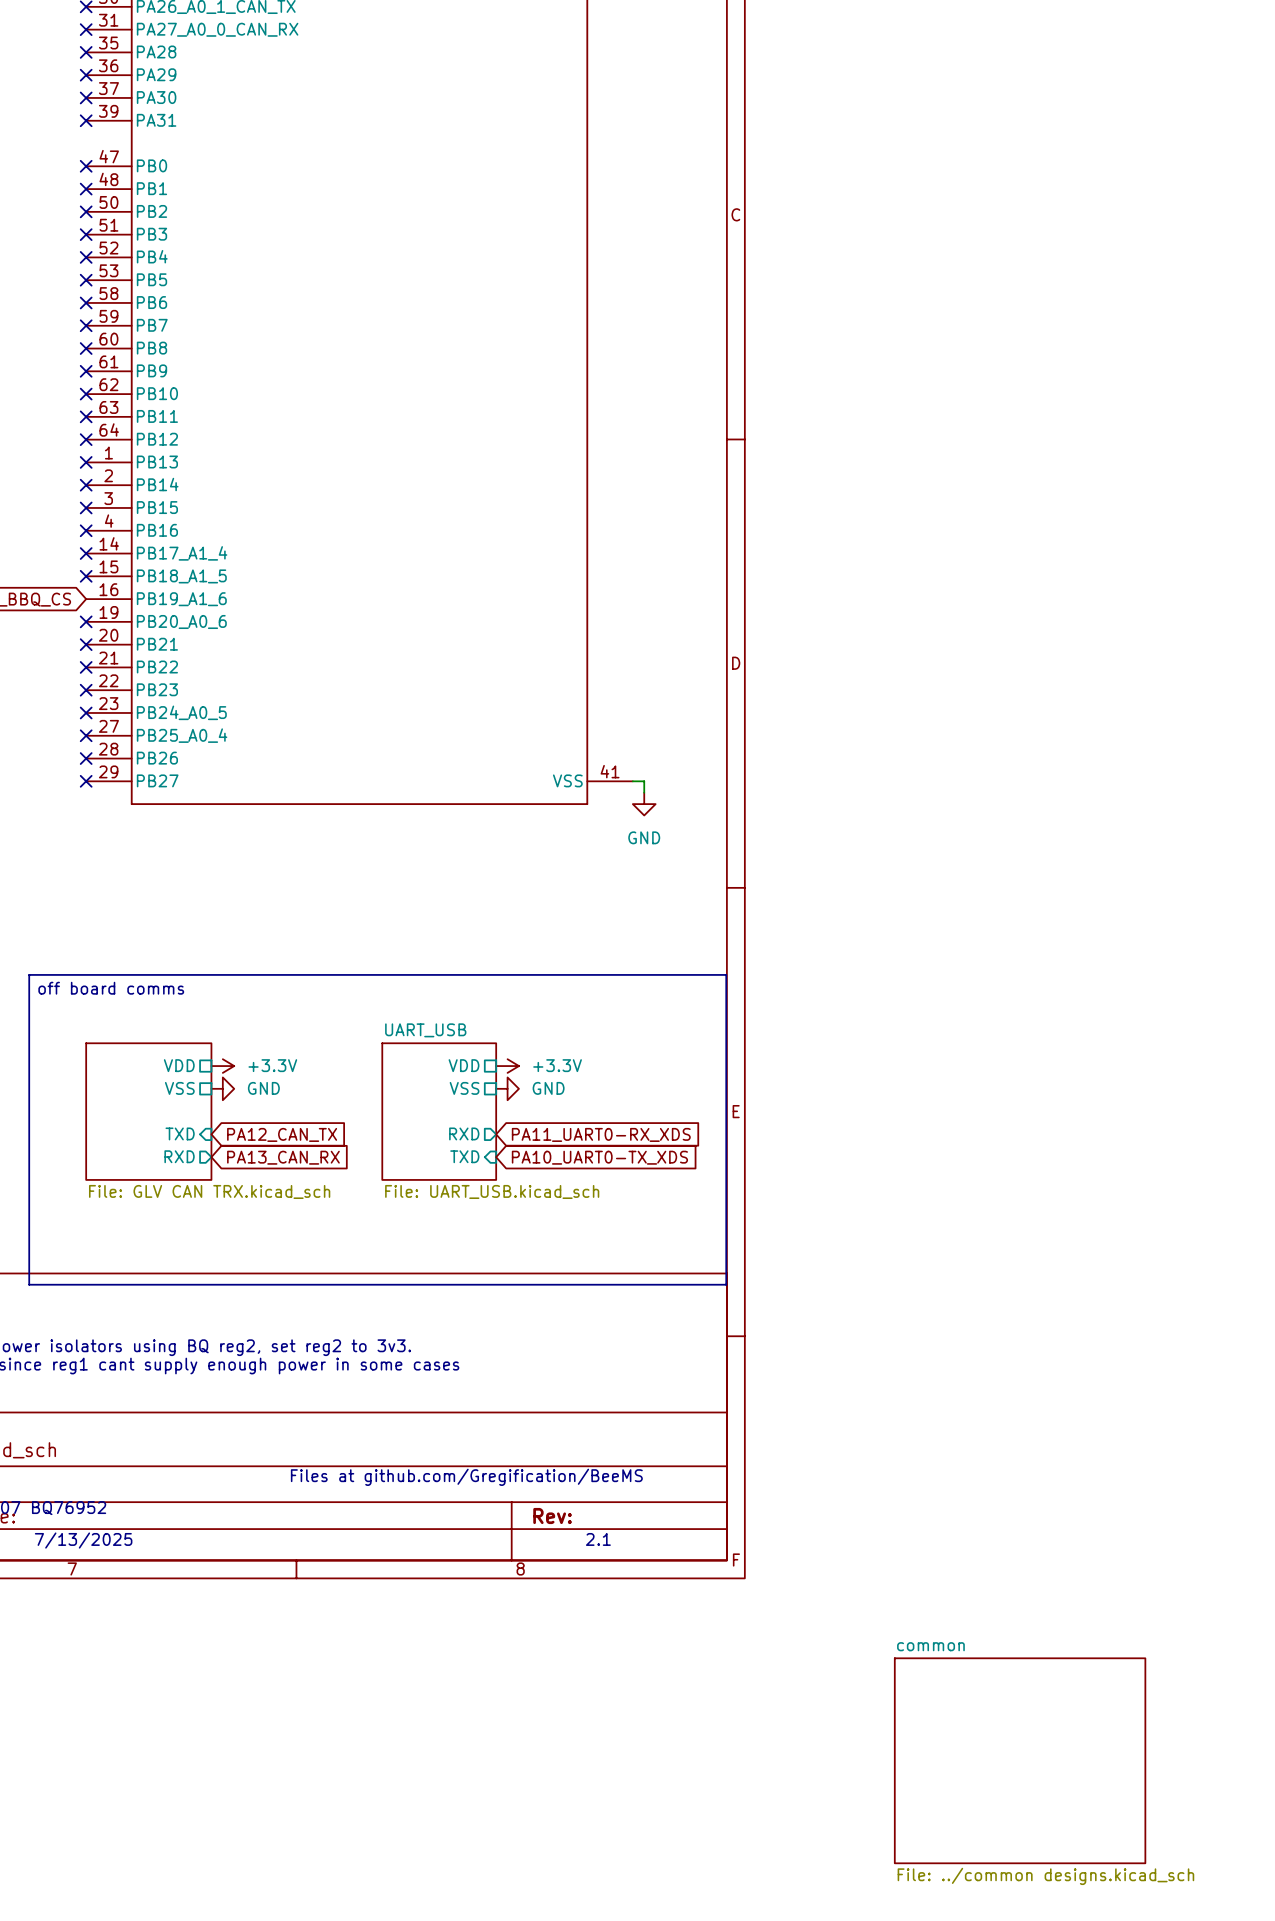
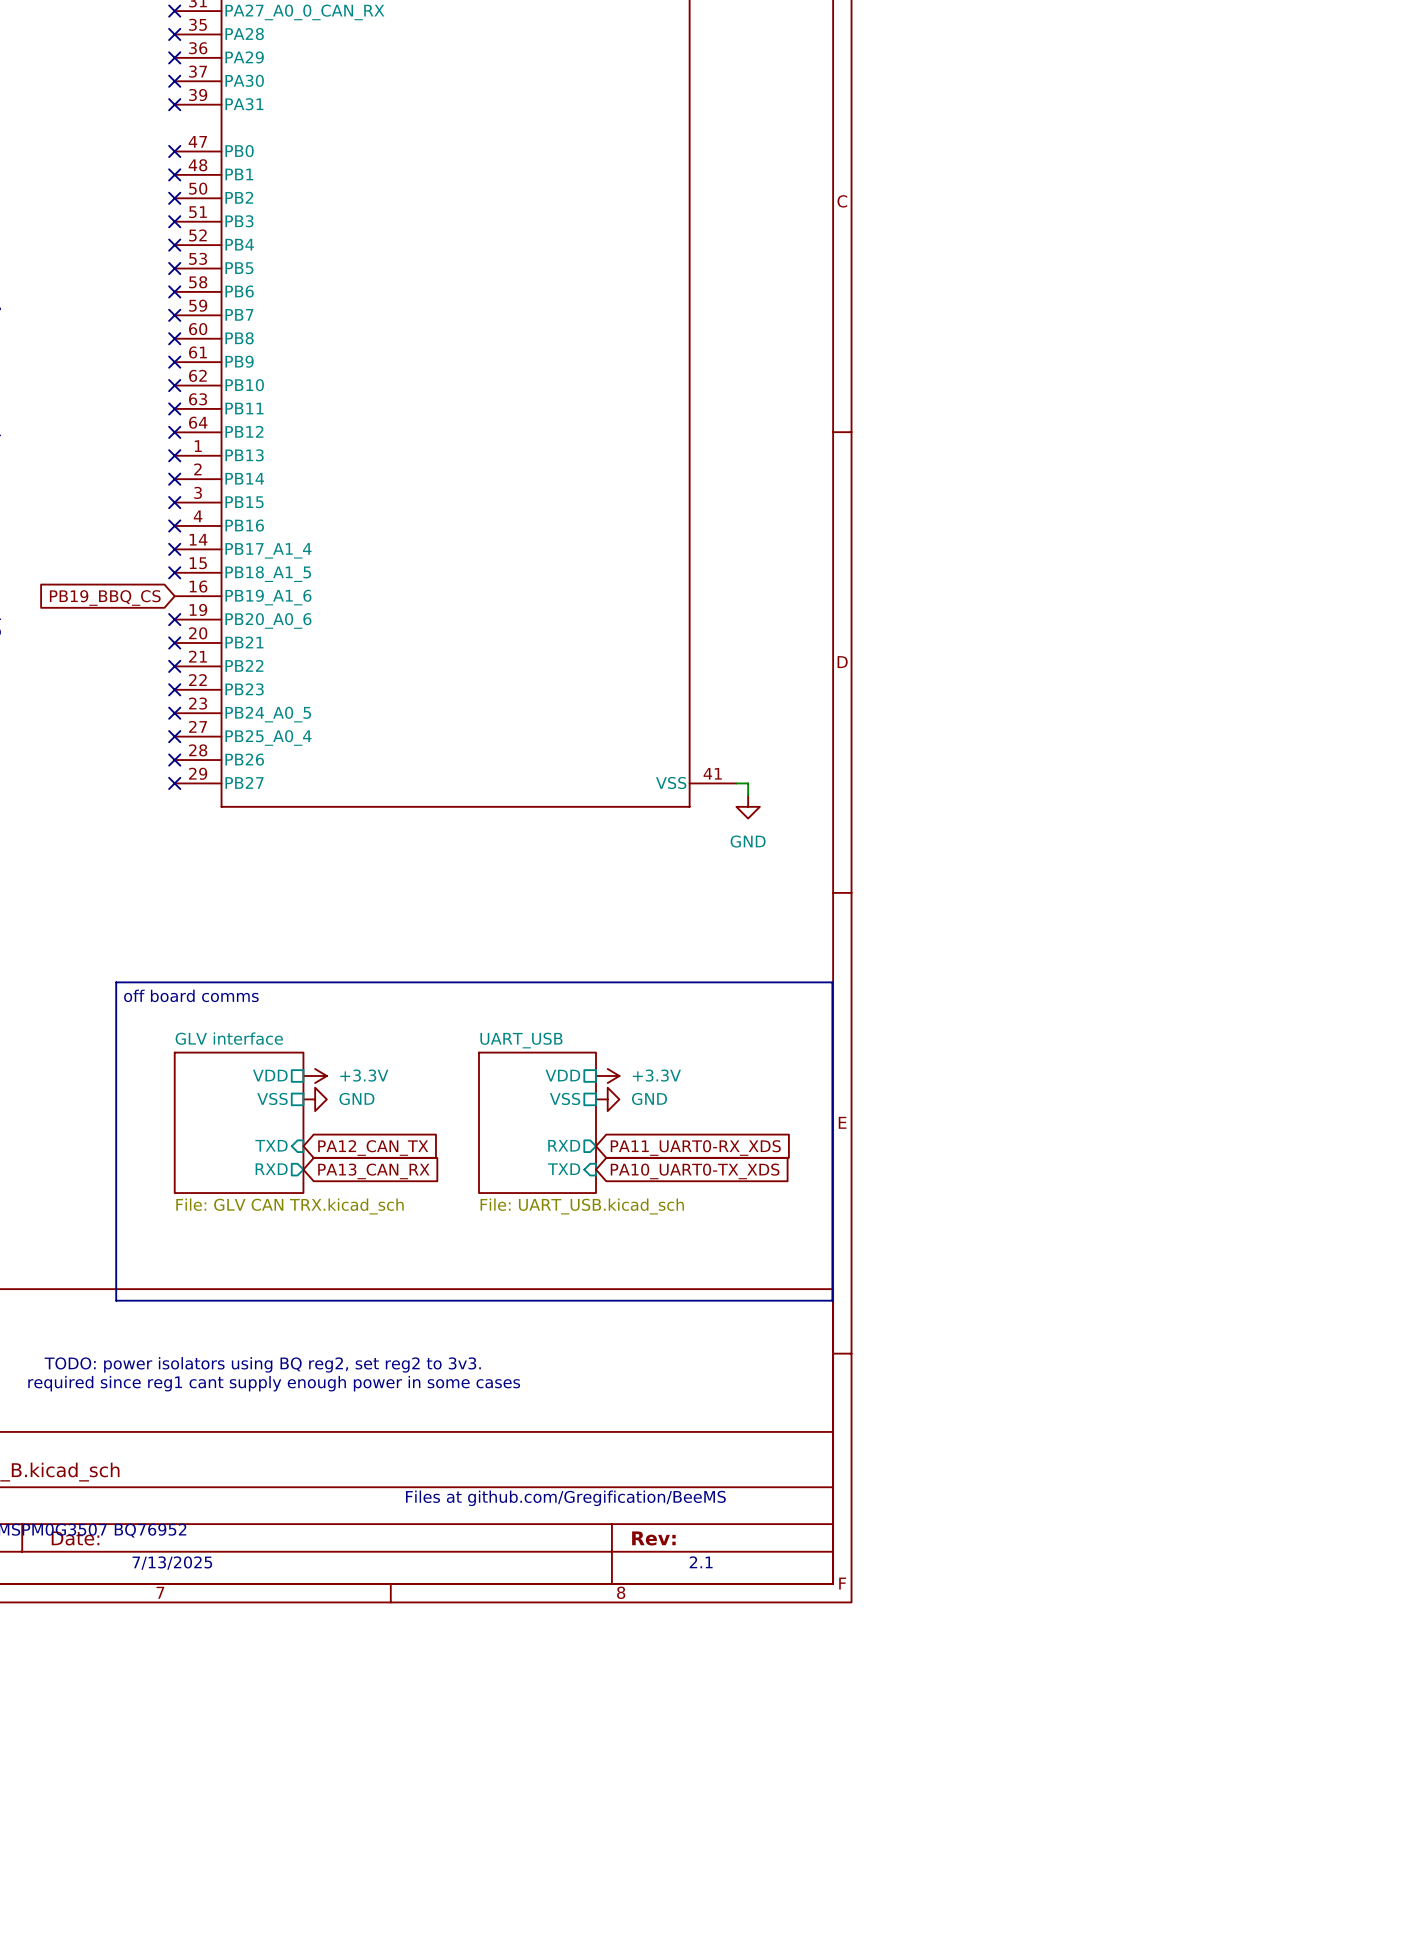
sheet GLV interface name: none -> GLV interface (229, 1038)
sheet common: File: ../common designs.kicad_sch (1020, 1760) -> none

